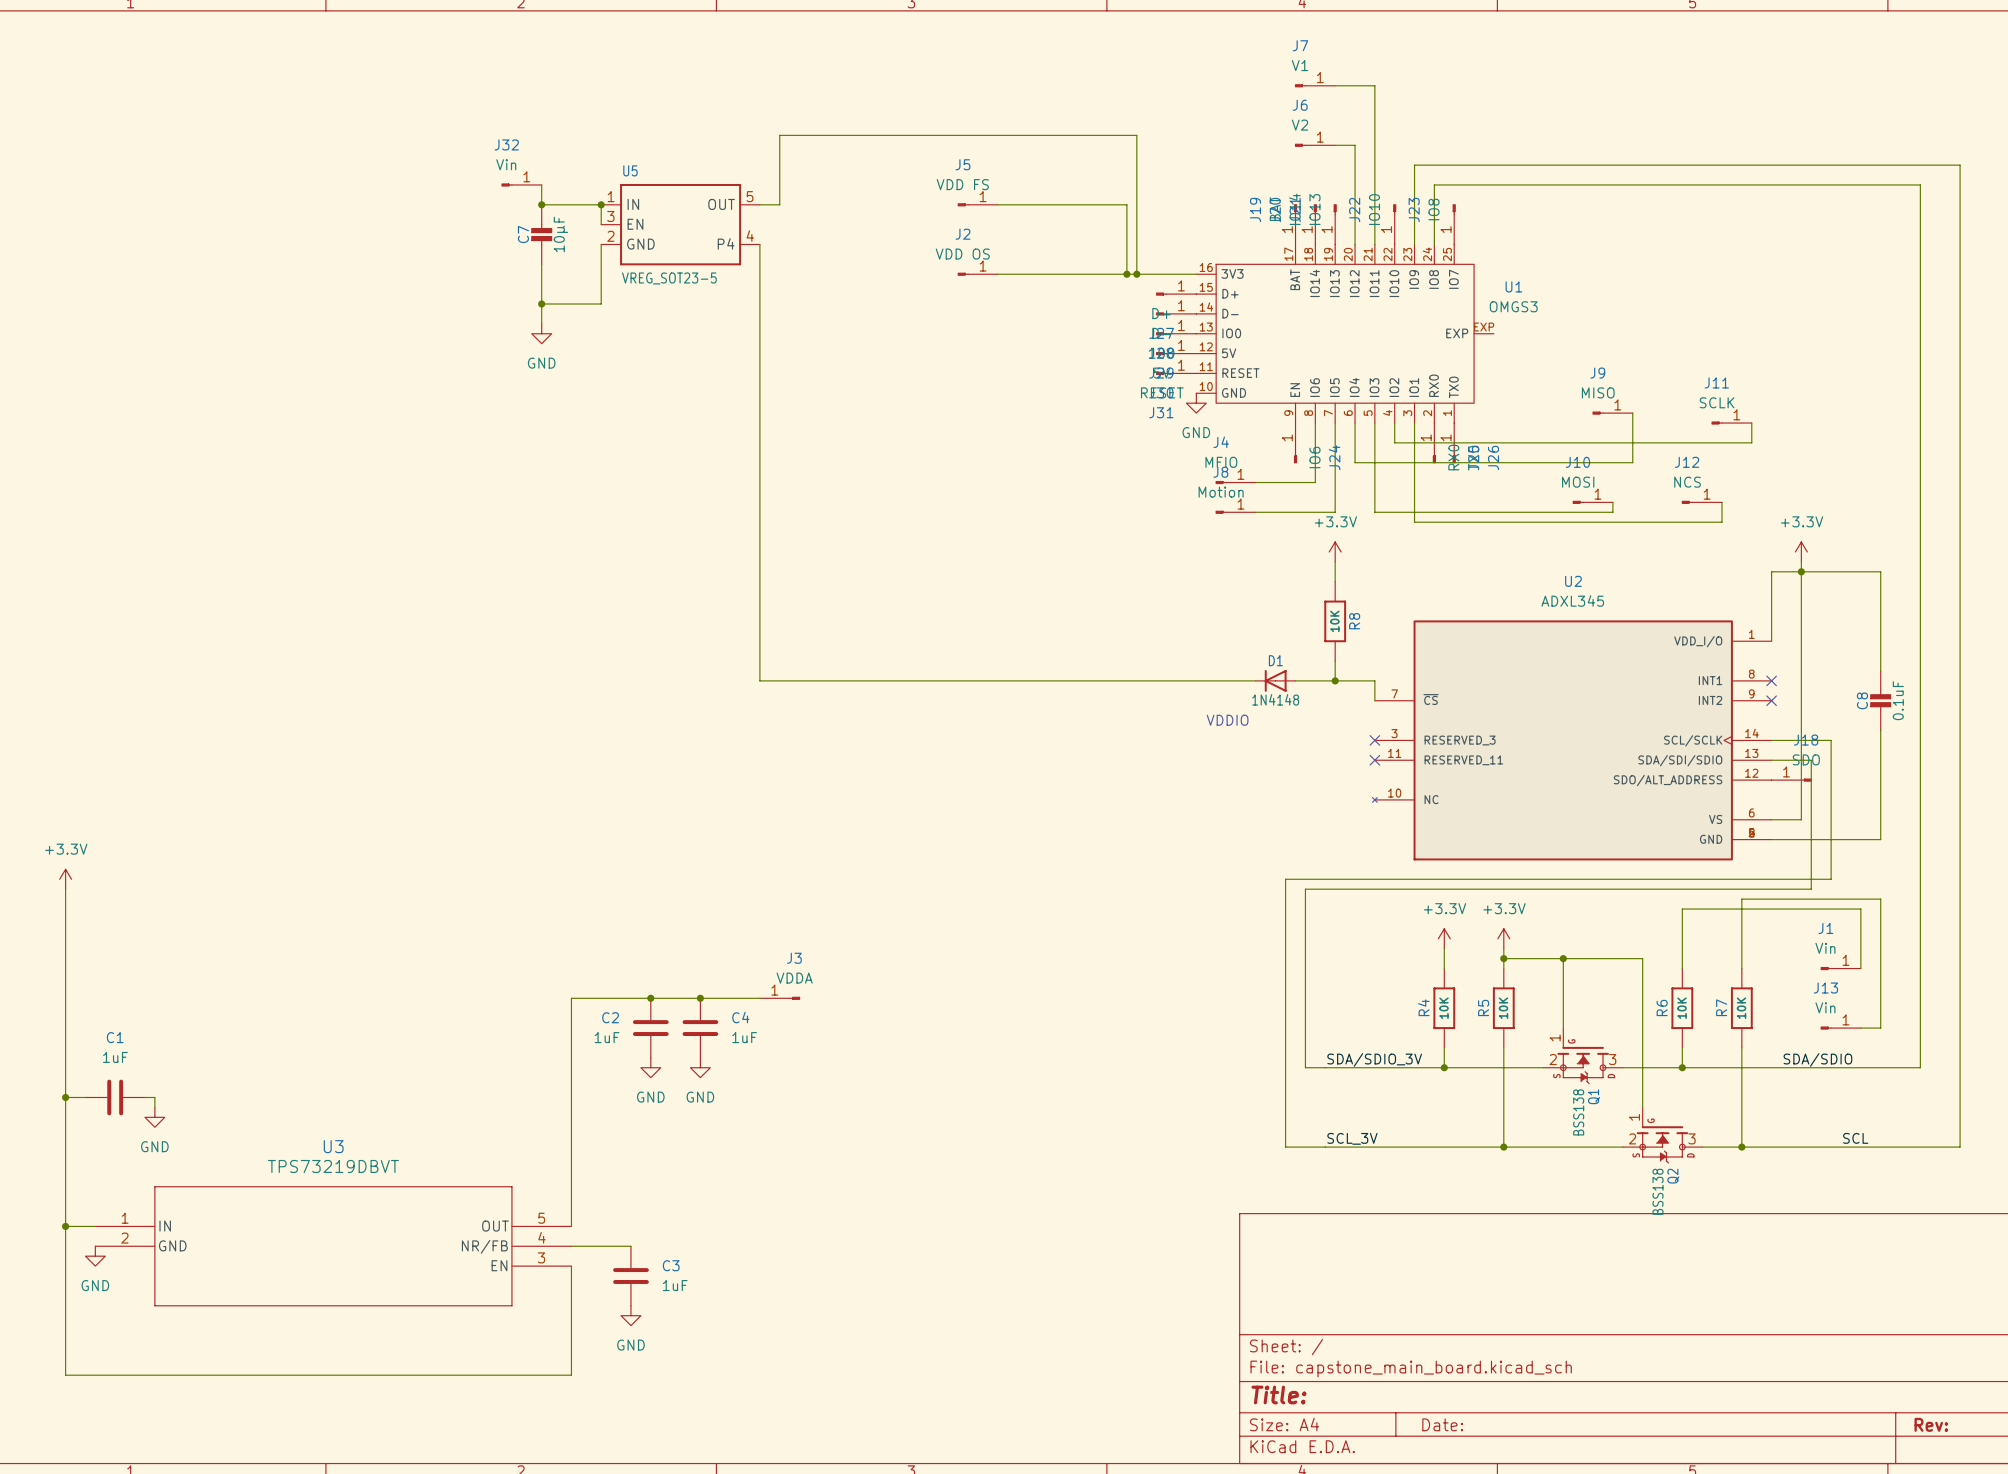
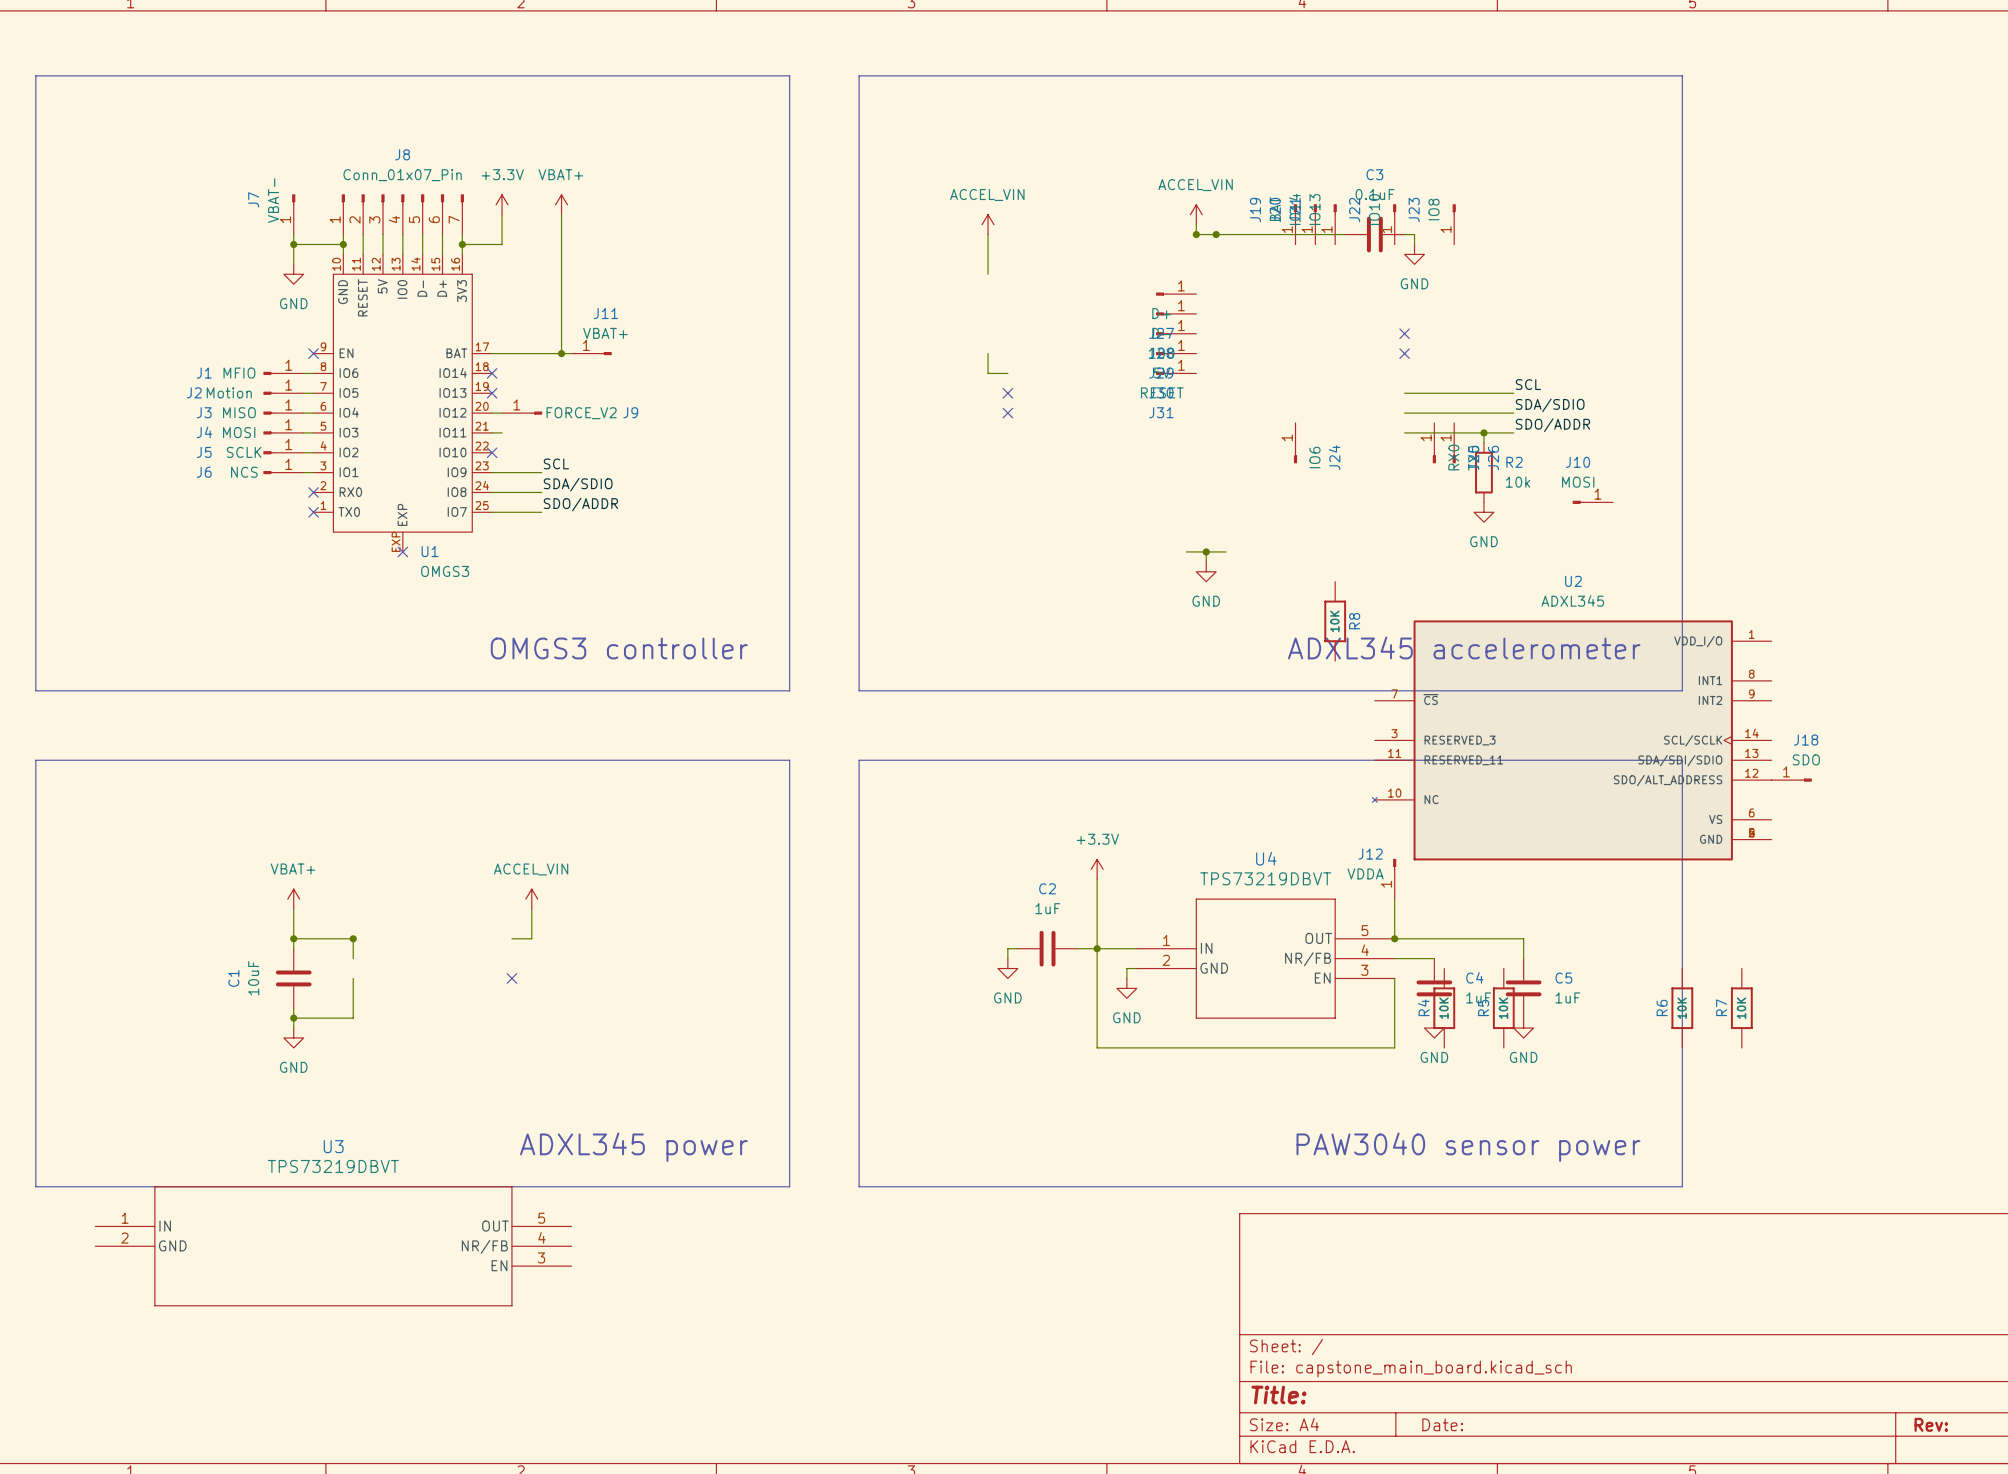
J7 name position: J7 (1300, 45) -> J7 (253, 199)
J7 value: V1 (1300, 65) -> VBAT- (273, 200)
line: none -> (35, 75) (35, 690) (789, 690) (789, 75) (35, 75)
line: none -> (859, 75) (1682, 75) (1682, 690) (859, 690) (859, 75)
J7 rotation: 0° (1300, 85) -> 90° clockwise (293, 199)
J7 position: (1315, 85) -> (293, 214)
wire: (1335, 85) (1374, 85) (1374, 244) -> none
J6 name position: J6 (1300, 105) -> J6 (204, 472)
J6 value: V2 (1300, 125) -> NCS (244, 472)
J6 position: (1315, 145) -> (283, 472)
wire: (1335, 145) (1355, 145) (1355, 244) -> none
J5 name position: J5 (963, 164) -> J5 (204, 452)
J32: Vin (521, 184) -> none
wire: (541, 184) (541, 204) (601, 204) (601, 224) -> none
J5 value: VDD FS (962, 184) -> SCLK (244, 452)
power symbol: none -> +3.3V (502, 204)
junction: (541, 204) -> none
power symbol: none -> VBAT+ (561, 204)
junction: (601, 204) -> none
wire: (759, 204) (779, 204) (779, 135) (1136, 135) (1136, 274) -> none
J5 position: (977, 204) -> (283, 452)
wire: (997, 204) (1126, 204) (1126, 274) -> none
wire: none -> (502, 214) (502, 244) (462, 244)
wire: none -> (561, 214) (561, 353)
power symbol: none -> ACCEL_VIN (1196, 214)
U5: VREG_SOT23-5 (680, 224) -> none
power symbol: none -> ACCEL_VIN (988, 224)
wire: none -> (1196, 224) (1196, 234) (1345, 234)
wire: none -> (293, 234) (293, 264)
wire: none -> (343, 234) (343, 254)
wire: none -> (363, 234) (363, 254)
wire: none -> (383, 234) (383, 254)
wire: none -> (402, 234) (402, 254)
wire: none -> (422, 234) (422, 254)
wire: none -> (442, 234) (442, 254)
wire: none -> (462, 234) (462, 254)
C7: 10µF (541, 234) -> none
J2 name position: J2 (963, 234) -> J2 (194, 392)
wire: none -> (988, 234) (988, 274)
junction: none -> (1196, 234)
junction: none -> (1216, 234)
wire: (1414, 234) (1414, 165) (1960, 165) (1960, 1147) (1702, 1147) -> (1414, 234) (1404, 234)
wire: none -> (293, 244) (343, 244)
junction: none -> (293, 244)
junction: none -> (343, 244)
junction: none -> (462, 244)
wire: (601, 244) (601, 304) (541, 304) -> none
wire: (759, 244) (759, 680) (1255, 680) -> none
wire: (1434, 244) (1434, 184) (1920, 184) (1920, 1067) (1622, 1067) -> none
J2 value: VDD OS (962, 254) -> Motion (229, 392)
power symbol: none -> GND (1414, 254)
wire: (541, 264) (541, 323) -> none
power symbol: none -> GND (293, 274)
J2 position: (977, 274) -> (283, 393)
wire: (997, 274) (1196, 274) -> none
junction: (1126, 274) -> none
junction: (1136, 274) -> none
U1 name position: U1 (1513, 286) -> U1 (430, 551)
junction: (541, 304) -> none
U1 value position: OMGS3 (1513, 306) -> OMGS3 (445, 571)
power symbol: GND (541, 333) -> none
U1 rotation: 0° (1345, 333) -> 90° clockwise (402, 403)
U1 position: (1345, 333) -> (402, 403)
no-connect mark: none -> (1404, 333)
no-connect mark: none -> (313, 353)
wire: none -> (492, 353) (571, 353)
junction: none -> (561, 353)
wire: none -> (988, 353) (988, 373) (1007, 373)
no-connect mark: none -> (1404, 353)
wire: none -> (303, 373) (313, 373)
no-connect mark: none -> (492, 373)
J9 name position: J9 (1597, 373) -> J9 (630, 412)
J11 name position: J11 (1716, 382) -> J11 (605, 313)
label: none -> SCL (1528, 384)
J9 value: MISO (1598, 392) -> FORCE_V2 (581, 413)
wire: none -> (303, 393) (313, 393)
no-connect mark: none -> (492, 393)
no-connect mark: none -> (1007, 393)
wire: none -> (1404, 393) (1513, 393)
J11 value: SCLK (1717, 402) -> VBAT+ (605, 333)
power symbol: GND (1196, 403) -> none
label: none -> SDA/SDIO (1550, 405)
wire: none -> (303, 413) (313, 413)
wire: none -> (492, 413) (502, 413)
no-connect mark: none -> (1007, 413)
wire: none -> (1404, 413) (1513, 413)
J9 rotation: 0° (1598, 413) -> 180° (536, 413)
J9 position: (1612, 413) -> (522, 413)
wire: (1632, 413) (1632, 462) (1355, 462) (1355, 423) -> none
wire: (1315, 423) (1315, 482) (1255, 482) -> none
wire: (1335, 423) (1335, 512) (1255, 512) -> none
wire: (1374, 423) (1374, 512) (1612, 512) (1612, 502) -> none
wire: (1394, 423) (1394, 442) (1751, 442) (1751, 423) -> none
wire: (1414, 423) (1414, 522) (1722, 522) (1722, 502) -> none
J11 rotation: 0° (1717, 423) -> 180° (606, 353)
J11 position: (1731, 423) -> (591, 353)
label: none -> SDO/ADDR (1552, 425)
wire: none -> (303, 432) (313, 432)
wire: none -> (492, 432) (502, 432)
wire: none -> (1404, 432) (1513, 432)
wire: none -> (1483, 432) (1483, 442)
junction: none -> (1483, 432)
J4 name position: J4 (1221, 442) -> J4 (204, 432)
wire: none -> (303, 452) (313, 452)
no-connect mark: none -> (492, 452)
J4 value: MFIO (1221, 462) -> MOSI (239, 432)
J12 name position: J12 (1687, 462) -> J12 (1370, 854)
label: none -> SCL (556, 463)
wire: none -> (303, 472) (313, 472)
wire: none -> (492, 472) (541, 472)
J8 name position: J8 (1220, 472) -> J8 (402, 154)
R2: none -> 10k (1483, 472)
J4 position: (1235, 482) -> (283, 432)
J12 value: NCS (1687, 482) -> VDDA (1365, 873)
label: none -> SDA/SDIO (578, 484)
no-connect mark: none -> (313, 492)
wire: none -> (492, 492) (541, 492)
J8 value: Motion (1221, 492) -> Conn_01x07_Pin (402, 175)
J12 rotation: 0° (1687, 502) -> 90° clockwise (1394, 864)
J12 position: (1701, 502) -> (1394, 878)
label: none -> SDO/ADDR (580, 504)
J8 symbol: [1215, 510, 1256, 514] -> [341, 194, 464, 235]
no-connect mark: none -> (313, 512)
wire: none -> (492, 512) (541, 512)
power symbol: none -> GND (1483, 512)
no-connect mark: none -> (402, 551)
wire: none -> (1186, 551) (1226, 551)
wire: none -> (1206, 551) (1206, 561)
junction: none -> (1206, 551)
power symbol: +3.3V (1335, 551) -> none
power symbol: +3.3V (1801, 551) -> none
wire: (1335, 561) (1335, 581) -> none
wire: (1801, 561) (1801, 819) (1771, 819) -> none
power symbol: none -> GND (1206, 571)
junction: (1801, 571) -> none
wire: (1771, 641) (1771, 571) (1880, 571) (1880, 670) -> none
text: none -> ADXL345 accelerometer (1464, 647)
text: none -> OMGS3 controller (619, 648)
wire: (1335, 661) (1335, 680) -> none
D1: 1N4148 (1275, 680) -> none
wire: (1295, 680) (1374, 680) (1374, 700) -> none
junction: (1335, 680) -> none
no-connect mark: (1771, 680) -> none
no-connect mark: (1771, 700) -> none
C8: 0.1uF (1880, 700) -> none
text: VDDIO (1227, 720) -> none
wire: (1880, 730) (1880, 839) (1771, 839) -> none
no-connect mark: (1374, 740) -> none
wire: (1771, 740) (1831, 740) (1831, 879) (1285, 879) (1285, 1147) (1622, 1147) -> none
line: none -> (35, 760) (789, 760) (789, 1186) (35, 1186) (35, 760)
line: none -> (859, 760) (1682, 760) (1682, 1186) (859, 1186) (859, 760)
no-connect mark: (1374, 760) -> none
wire: (1771, 760) (1811, 760) (1811, 889) (1305, 889) (1305, 1067) (1543, 1067) -> none
power symbol: none -> +3.3V (1097, 869)
power symbol: +3.3V (65, 879) -> none
wire: none -> (1097, 879) (1097, 1047) (1394, 1047) (1394, 978)
wire: (65, 889) (65, 1375) (571, 1375) (571, 1266) -> none
power symbol: none -> VBAT+ (293, 899)
power symbol: none -> ACCEL_VIN (531, 899)
wire: none -> (1394, 899) (1394, 938) (1523, 938) (1523, 958)
wire: none -> (293, 909) (293, 948)
wire: none -> (531, 909) (531, 938) (511, 938)
J1 name position: J1 (1825, 928) -> J1 (204, 373)
wire: none -> (293, 938) (353, 938) (353, 958)
junction: none -> (293, 938)
junction: none -> (353, 938)
junction: none -> (1394, 938)
power symbol: +3.3V (1444, 938) -> none
power symbol: +3.3V (1503, 938) -> none
wire: none -> (1017, 948) (1007, 948) (1007, 958)
wire: none -> (1077, 948) (1136, 948)
junction: none -> (1097, 948)
wire: (1444, 948) (1444, 968) -> none
wire: (1503, 948) (1503, 968) -> none
J1 value: Vin (1825, 948) -> MFIO (239, 373)
J3 name position: J3 (794, 958) -> J3 (204, 412)
U4: none -> TPS73219DBVT (1265, 958)
wire: none -> (1394, 958) (1434, 958)
wire: (1503, 958) (1642, 958) (1642, 1107) -> none
junction: (1503, 958) -> none
wire: (1563, 958) (1563, 1028) -> none
junction: (1563, 958) -> none
power symbol: none -> GND (1007, 968)
wire: none -> (1136, 968) (1126, 968) (1126, 978)
wire: (1682, 968) (1682, 909) (1860, 909) (1860, 968) -> none
wire: (1741, 968) (1741, 899) (1880, 899) (1880, 1028) (1860, 1028) -> none
J1 position: (1840, 968) -> (283, 373)
wire: none -> (353, 978) (353, 1018) (293, 1018)
no-connect mark: none -> (511, 978)
J3 value: VDDA (794, 978) -> MISO (239, 412)
power symbol: none -> GND (1126, 988)
C5: none -> 1uF (1523, 988)
junction: (650, 998) -> none
junction: (700, 998) -> none
wire: (759, 998) (571, 998) (571, 1226) -> none
J3 position: (780, 998) -> (283, 413)
J3 rotation: 0° (794, 998) -> 180° (268, 413)
wire: none -> (293, 1008) (293, 1028)
C2 name position: C2 (610, 1017) -> C2 (1047, 888)
junction: none -> (293, 1018)
C2 rotation: 0° (650, 1028) -> 90° clockwise (1047, 948)
C2 position: (650, 1028) -> (1047, 948)
C4 position: (700, 1028) -> (1434, 988)
power symbol: none -> GND (1434, 1028)
power symbol: none -> GND (1523, 1028)
J13: Vin (1840, 1028) -> none
C1 name position: C1 (115, 1037) -> C1 (233, 978)
power symbol: none -> GND (293, 1037)
wire: (1444, 1047) (1444, 1067) -> none
wire: (1503, 1047) (1503, 1147) -> none
wire: (1741, 1047) (1741, 1147) -> none
Q1: BSS138 (1583, 1056) -> none
C1 value: 1uF (115, 1057) -> 10uF (253, 978)
label: SDA/SDIO_3V (1374, 1059) -> none
label: SDA/SDIO (1817, 1059) -> none
power symbol: GND (650, 1067) -> none
power symbol: GND (700, 1067) -> none
junction: (1444, 1067) -> none
junction: (1682, 1067) -> none
wire: (65, 1097) (85, 1097) -> none
junction: (65, 1097) -> none
C1 rotation: 0° (115, 1097) -> 90° clockwise (293, 978)
C1 position: (115, 1097) -> (293, 978)
wire: (144, 1097) (154, 1097) (154, 1107) -> none
power symbol: GND (154, 1117) -> none
Q2: BSS138 (1662, 1135) -> none
label: SCL_3V (1352, 1138) -> none
label: SCL (1855, 1138) -> none
text: none -> ADXL345 power (633, 1147)
text: none -> PAW3040 sensor power (1468, 1147)
junction: (1503, 1147) -> none
junction: (1741, 1147) -> none
wire: (65, 1226) (95, 1226) -> none
junction: (65, 1226) -> none
wire: (571, 1246) (630, 1246) -> none
power symbol: GND (95, 1256) -> none
C3 name position: C3 (671, 1265) -> C3 (1374, 174)
C3 rotation: 0° (630, 1276) -> 90° clockwise (1374, 234)
C3 position: (630, 1276) -> (1374, 234)
C3 value: 1uF (675, 1285) -> 0.1uF (1375, 194)
power symbol: GND (630, 1315) -> none

